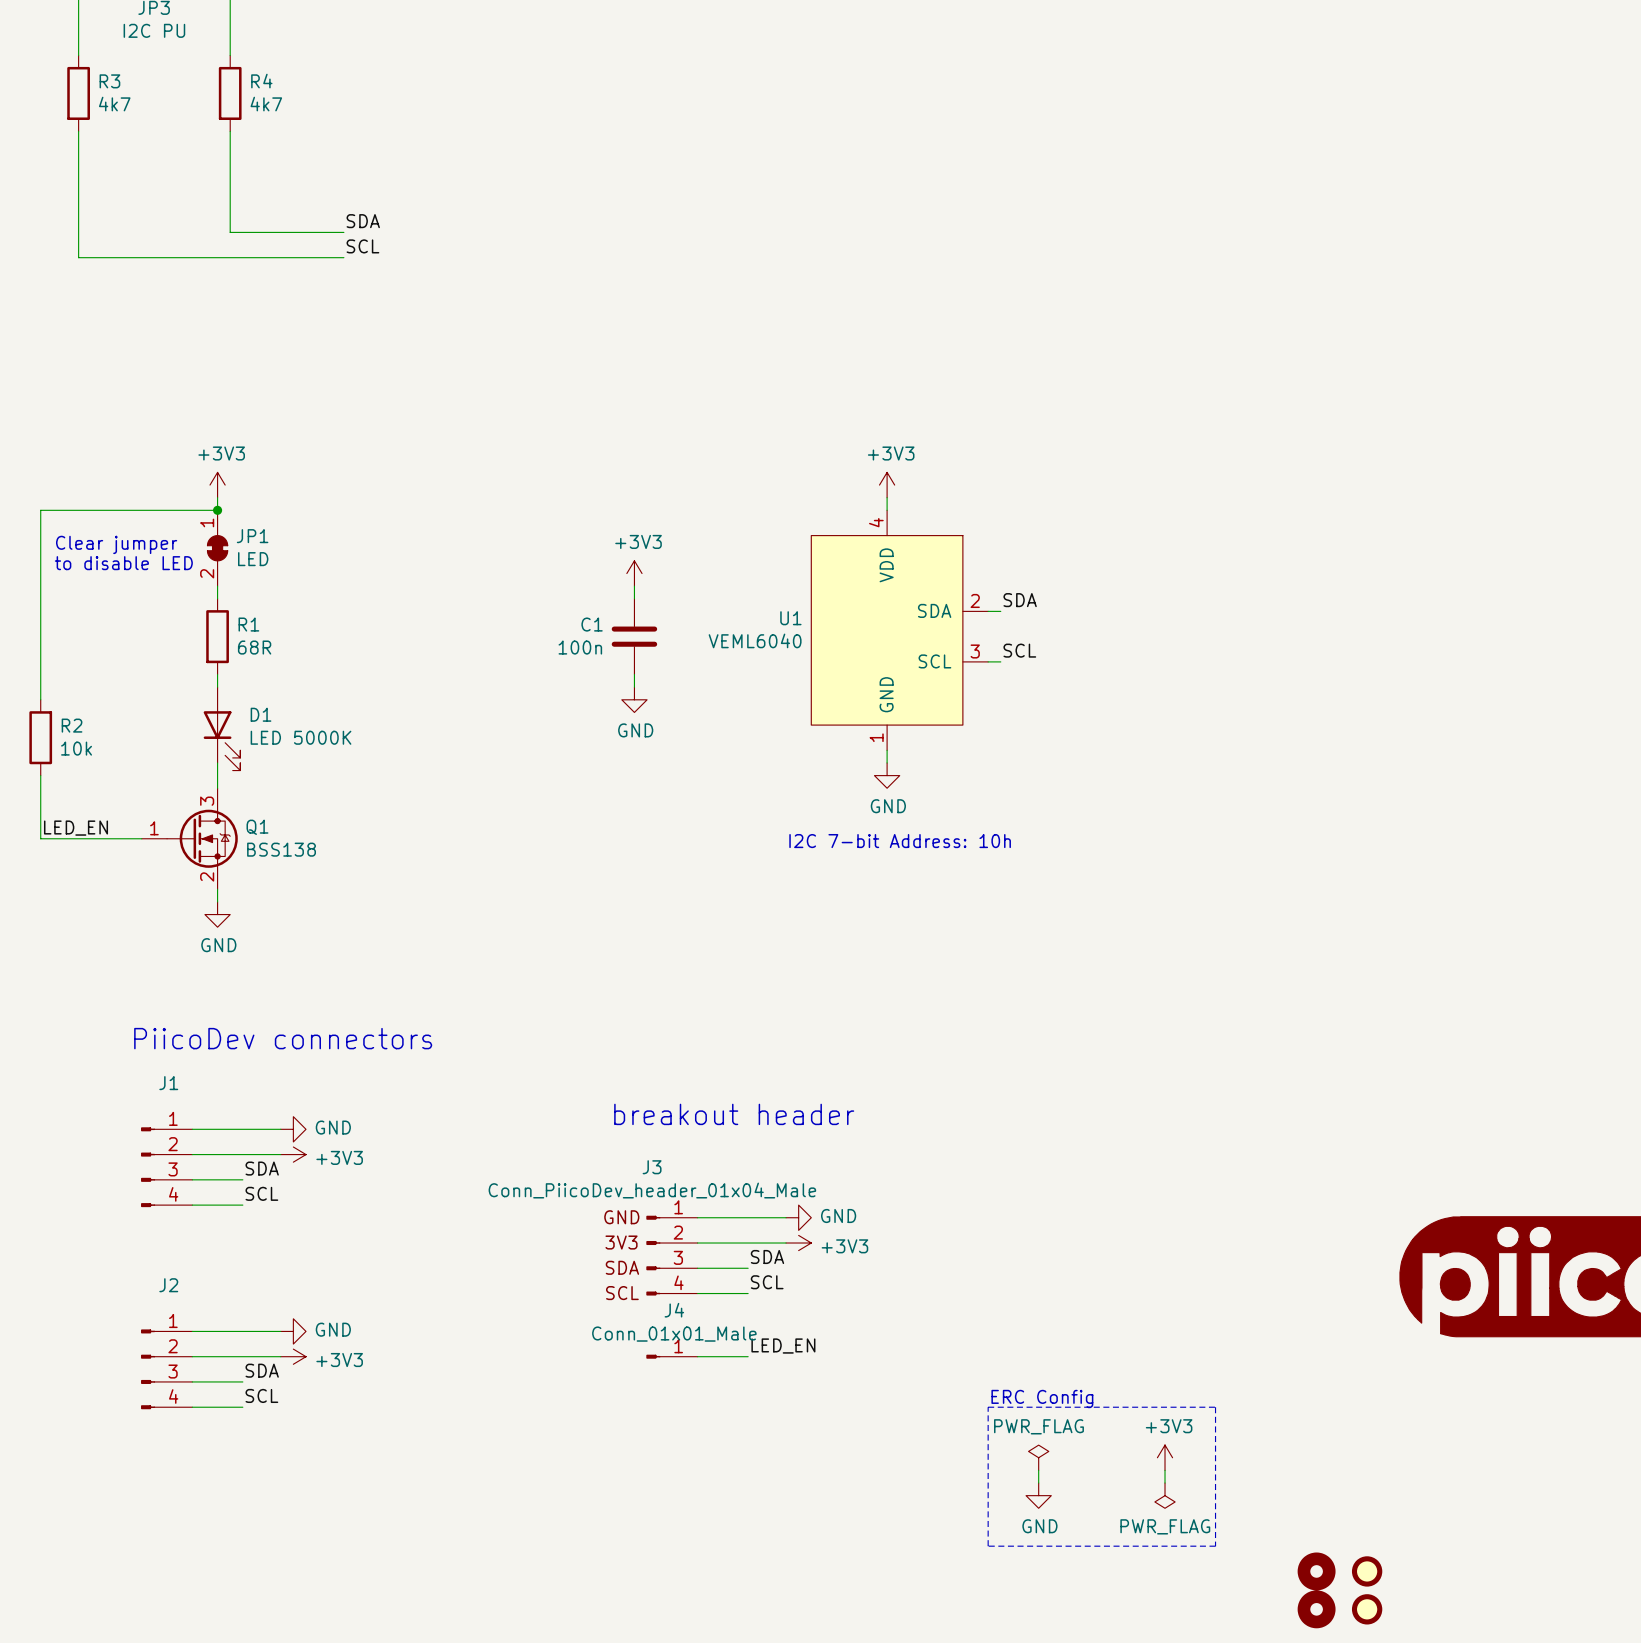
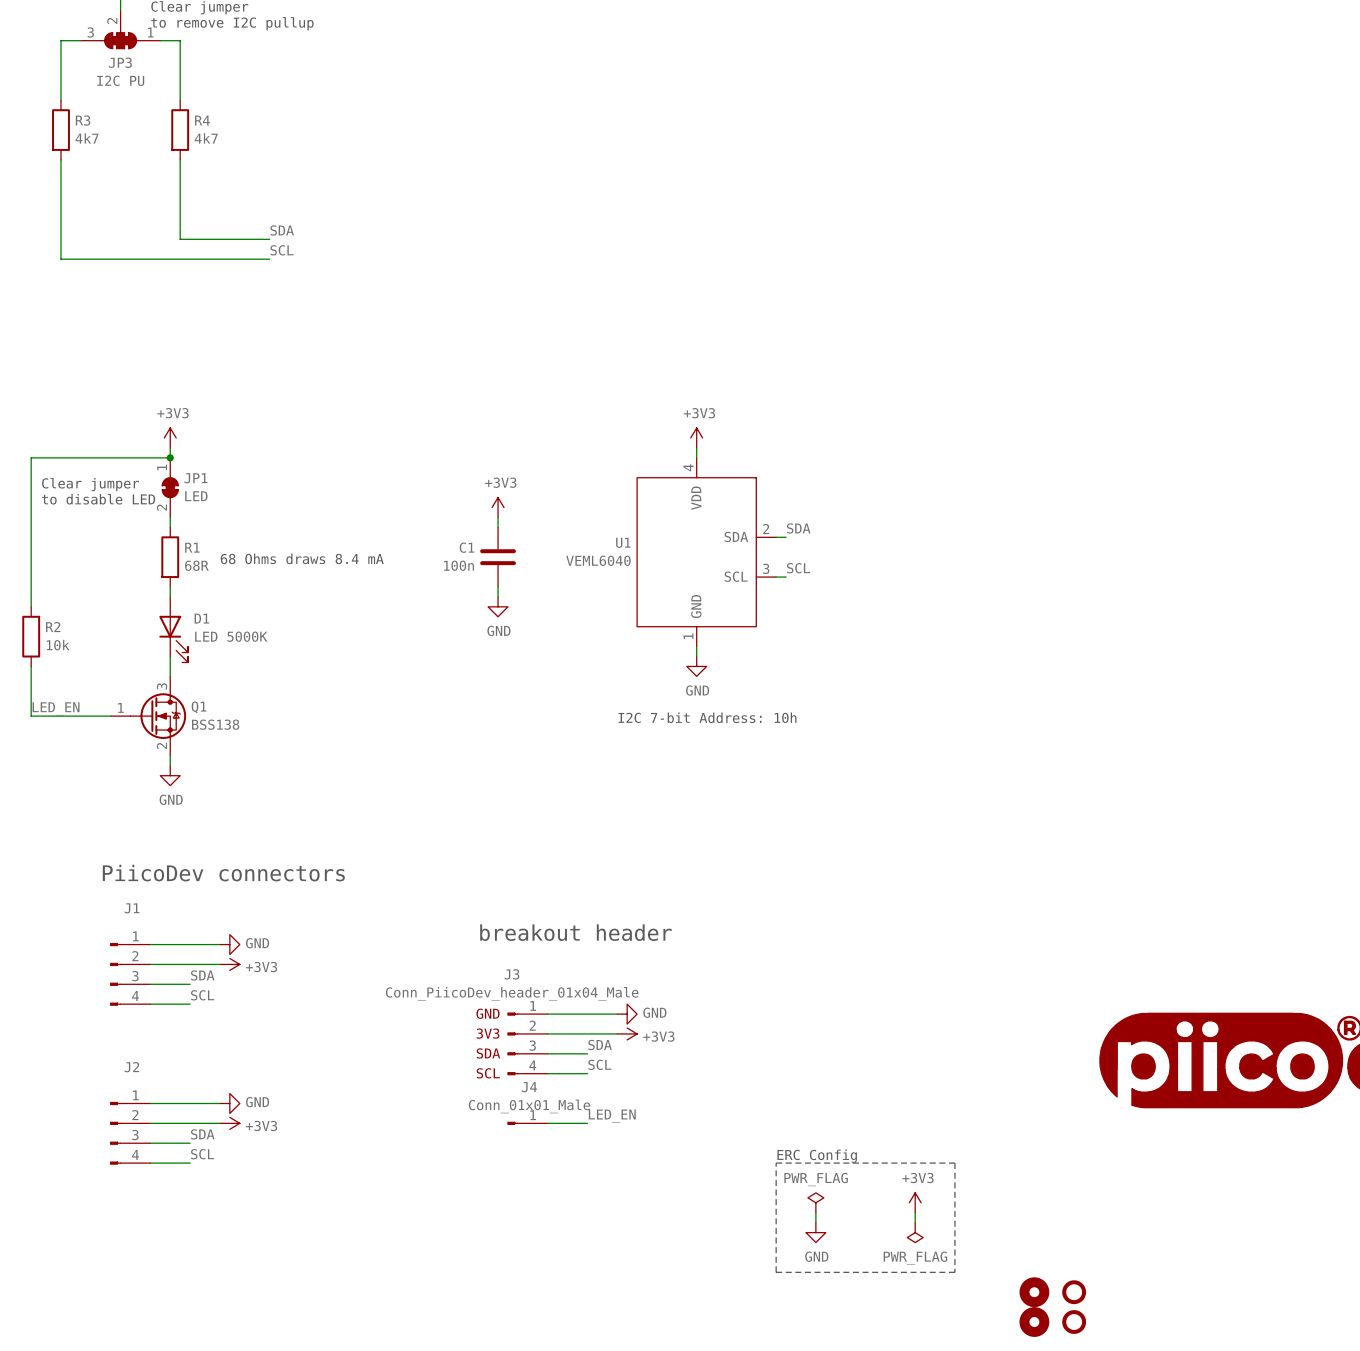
text: none -> 68 Ohms draws 8.4 mA (302, 558)

